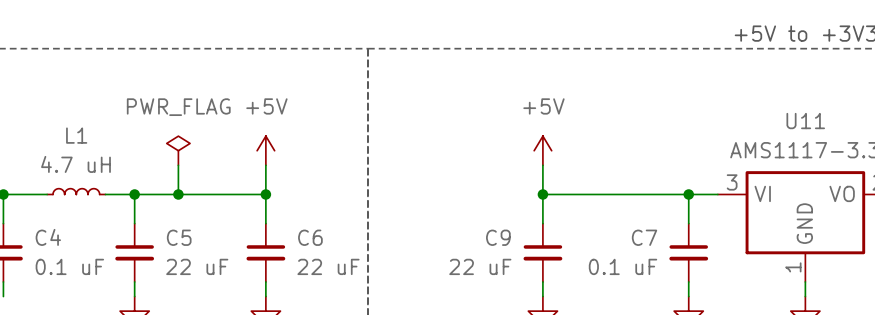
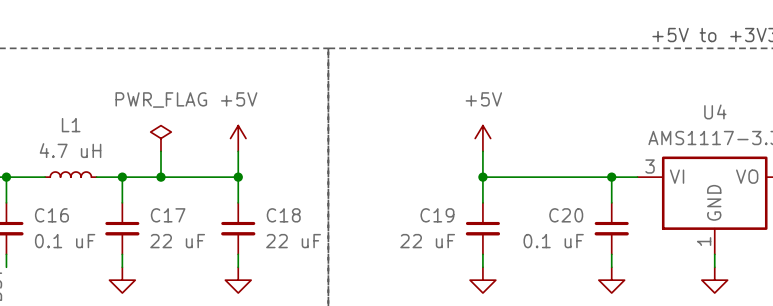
U11 name: U11 (805, 121) -> U4 (715, 111)
C4 name: C4 (48, 237) -> C16 (51, 215)
C5 name: C5 (179, 237) -> C17 (168, 215)
C6 name: C6 (310, 237) -> C18 (283, 215)
C9 name: C9 (498, 237) -> C19 (437, 215)
C7 name: C7 (644, 237) -> C20 (566, 215)

